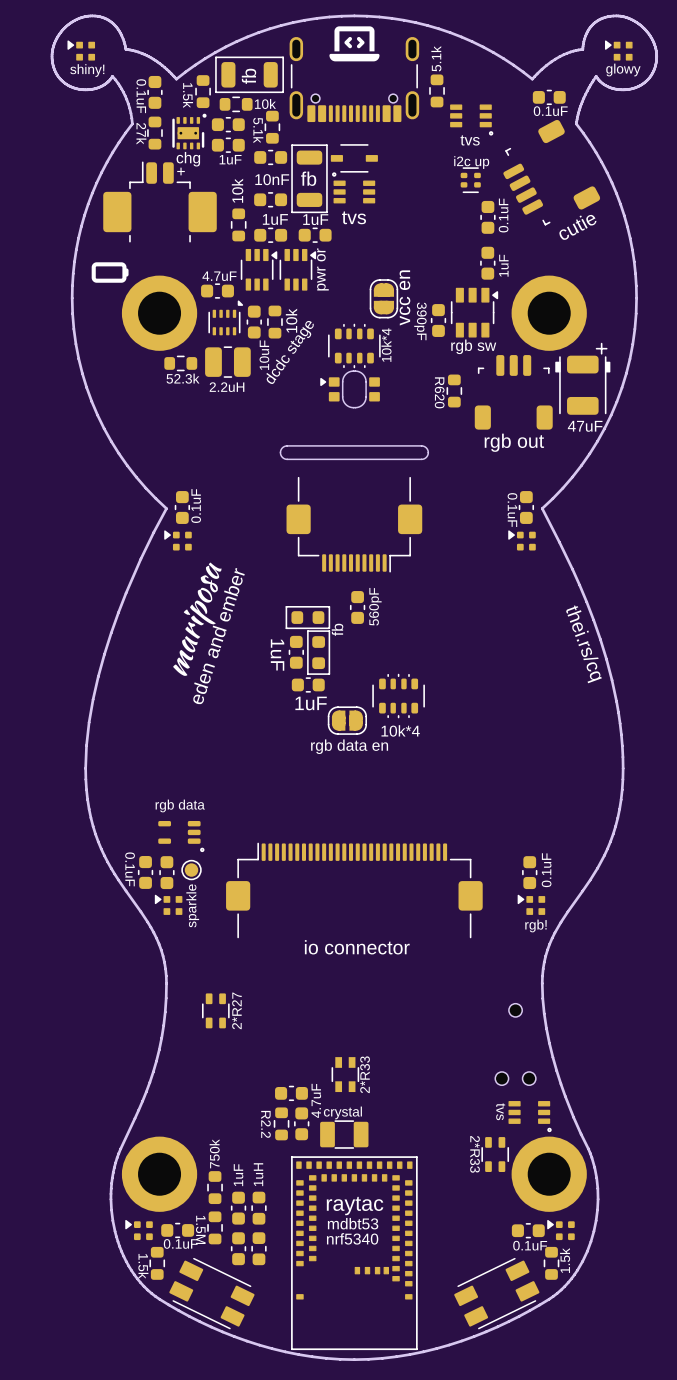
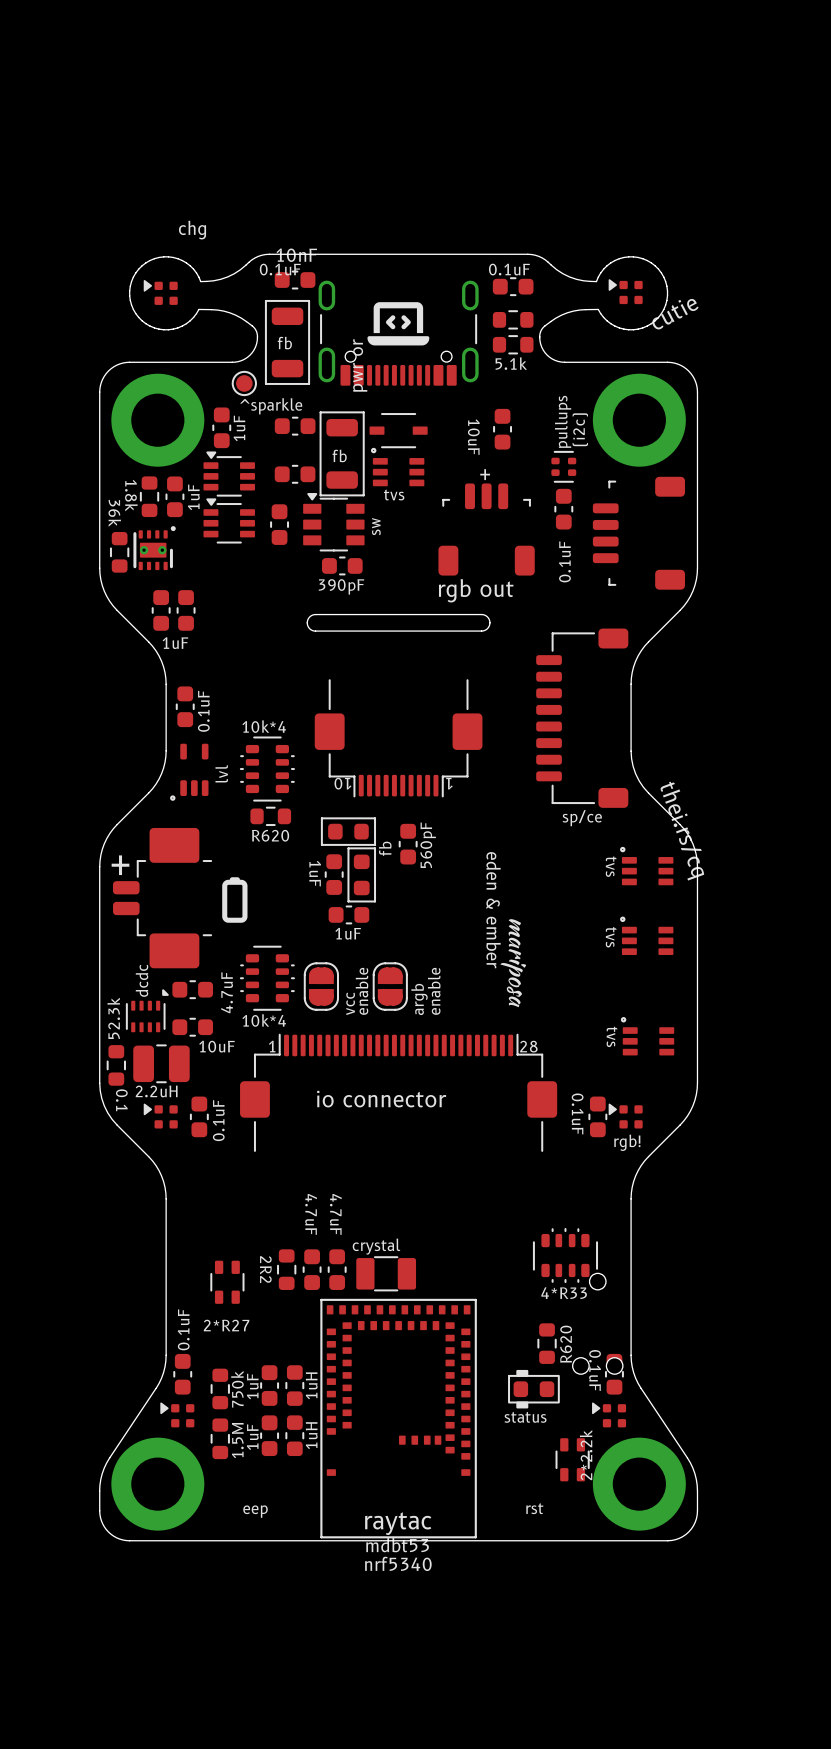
board edge: (90, 15) (73, 21) (59, 34) (52, 52) (54, 69) (65, 83) (82, 89) (99, 87) (112, 76) (126, 99) (132, 123) (101, 172) (81, 226) (74, 261) (72, 285) (75, 344) (86, 387) (104, 428) (127, 465) (166, 508) (140, 558) (111, 633) (93, 699) (86, 745) (86, 789) (95, 834) (111, 868) (153, 932) (163, 955) (166, 976) (163, 1025) (156, 1061) (142, 1101) (118, 1153) (113, 1172) (110, 1199) (115, 1231) (128, 1265) (147, 1290) (189, 1316) (234, 1336) (285, 1351) (340, 1359) (382, 1358) (436, 1348) (497, 1326) (529, 1310) (557, 1293) (571, 1278) (582, 1261) (590, 1241) (596, 1220) (597, 1188) (594, 1167) (565, 1096) (552, 1057) (544, 1013) (542, 976) (545, 955) (554, 932) (597, 868) (613, 834) (622, 789) (622, 745) (616, 701) (600, 639) (579, 585) (542, 508) (581, 465) (604, 428) (616, 401) (626, 373) (634, 329) (635, 273) (627, 226) (607, 172) (576, 124) (578, 114) (585, 94) (596, 76) (605, 85) (619, 89) (633, 88) (645, 81) (655, 66) (655, 48) (649, 34) (636, 22) (622, 16) (605, 17) (596, 21) (589, 28) (584, 38) (582, 49) (570, 51) (555, 59) (532, 79) (483, 46) (439, 28) (391, 18) (341, 16) (304, 20) (258, 32) (215, 52) (176, 79) (151, 57) (125, 49) (120, 32) (110, 21) (100, 16) (90, 15) -> (156, 1388) (109, 1457) (100, 1479) (101, 1520) (110, 1534) (122, 1540) (667, 1540) (682, 1536) (688, 1531) (695, 1522) (697, 1491) (692, 1468) (641, 1388) (632, 1366) (631, 1198) (633, 1181) (641, 1165) (683, 1120) (692, 1105) (696, 1094) (697, 860) (692, 843) (687, 833) (643, 787) (635, 773) (631, 751) (631, 684) (633, 666) (641, 650) (683, 606) (692, 591) (696, 579) (697, 388) (690, 373) (677, 363) (667, 362) (561, 362) (552, 358) (544, 352) (539, 337) (541, 329) (550, 321) (567, 312) (579, 310) (598, 309) (606, 320) (623, 329) (638, 329) (651, 323) (663, 309) (667, 290) (661, 273) (647, 260) (633, 256) (614, 260) (603, 269) (596, 281) (569, 276) (542, 257) (527, 254) (265, 254) (254, 258) (227, 276) (200, 281) (193, 269) (186, 262) (173, 257) (163, 256) (145, 262) (133, 277) (129, 290) (131, 305) (138, 317) (149, 326) (159, 329) (173, 329) (190, 320) (198, 309) (217, 310) (241, 318) (254, 327) (257, 336) (253, 350) (240, 360) (122, 363) (113, 366) (106, 373) (99, 388) (100, 579) (104, 591) (113, 606) (156, 650) (161, 661) (165, 678) (166, 750) (163, 768) (152, 788) (109, 833) (102, 849) (99, 866) (100, 1090) (104, 1105) (112, 1119) (156, 1165) (161, 1175) (165, 1193) (165, 1361) (161, 1378) (156, 1388)
drawing position: (354, 38) -> (398, 317)
drawing position: (348, 42) -> (390, 322)
drawing position: (360, 42) -> (406, 322)
part: (81, 50) -> none
part: (618, 50) -> none
drawing position: (354, 57) -> (398, 340)
text: 5.1k (436, 58) -> none
text: glowy (623, 69) -> none
text: shiny! (87, 70) -> none
part: (249, 74) -> none
text: fb (249, 76) -> none
part position: (354, 79) -> (398, 333)
part: (437, 90) -> none
part: (203, 91) -> none
part: (154, 92) -> none
text: 1.5k (188, 95) -> none
text: 0.1uF (141, 96) -> none
part: (549, 97) -> none
text: 10k (265, 103) -> none
part: (236, 104) -> none
text: 0.1uF (550, 111) -> none
part: (471, 120) -> none
part: (228, 124) -> none
part: (272, 127) -> none
text: 5.1k (258, 130) -> none
part position: (189, 131) -> (154, 548)
text: 27k (141, 133) -> none
part: (154, 133) -> none
text: tvs (470, 140) -> none
part: (228, 145) -> none
part: (270, 157) -> none
part position: (354, 158) -> (398, 430)
text: 1uF (230, 159) -> none
part footprint: [103, 161, 217, 243] -> [143, 280, 178, 305]
text: i2c up (471, 162) -> none
text: + (181, 171) -> none
part: (551, 172) -> none
text: fb (308, 178) -> none
part: (309, 178) -> none
part position: (470, 180) -> (563, 466)
part: (353, 187) -> none
text: 10k (237, 190) -> 0.1uF (280, 269)
text: none -> 0.1uF (509, 269)
part: none -> (513, 286)
part: none -> (625, 291)
text: 0.1uF (503, 215) -> none
text: tvs (354, 217) -> none
part: (487, 217) -> none
text: 1uF (275, 219) -> none
text: 1uF (315, 219) -> none
part: (238, 224) -> none
part: none -> (513, 319)
part: (270, 235) -> none
part: (315, 235) -> none
text: none -> fb (284, 343)
part: none -> (287, 342)
part: none -> (513, 344)
drawing: [91, 262, 129, 283] -> none
part: (487, 263) -> none
text: 1uF (503, 265) -> none
text: none -> 5.1k (511, 363)
part: (259, 269) -> none
part: (297, 269) -> none
text: 4.7uF (219, 276) -> none
part: none -> (244, 383)
part: (217, 291) -> none
text: vcc en (404, 297) -> none
part: (383, 298) -> none
text: none -> ^sparkle (271, 406)
part footprint: [267, 305, 283, 339] -> [274, 416, 316, 436]
part rotation: 0° (474, 312) -> 90° counterclockwise (333, 522)
part position: (474, 312) -> (333, 522)
text: none -> pullups (563, 421)
part: (225, 317) -> none
part: none -> (221, 427)
text: none -> 1uF (239, 428)
text: 10k (291, 320) -> none
text rotation: 0° (420, 321) -> 90° counterclockwise (341, 586)
text position: 390pF (420, 321) -> 390pF (341, 586)
part: (254, 322) -> none
text: none -> (i2c) (580, 429)
part footprint: [328, 323, 381, 369] -> [370, 447, 425, 487]
part: none -> (342, 453)
text: none -> fb (339, 455)
text: 10k*4 (386, 345) -> none
part footprint: [205, 346, 251, 378] -> [203, 451, 255, 497]
text: rgb sw (473, 346) -> none
text: dcdc stage (290, 351) -> none
text rotation: 0° (264, 355) -> 180° (473, 437)
text position: 10uF (264, 355) -> 10uF (473, 437)
text: none -> + (485, 474)
part: none -> (295, 474)
part rotation: 0° (180, 363) -> 90° clockwise (149, 496)
part position: (180, 363) -> (149, 496)
text: none -> 1.8k (131, 495)
text: none -> tvs (394, 494)
part: none -> (174, 496)
text: none -> 1uF (193, 497)
text: 52.3k (182, 378) -> none
part: (582, 378) -> none
part: none -> (563, 509)
text: none -> 36k (114, 513)
text: 2.2uH (227, 387) -> none
part: (350, 389) -> none
part: (454, 391) -> none
text: R620 (439, 392) -> none
part position: (513, 392) -> (486, 529)
part: none -> (229, 520)
part: none -> (279, 524)
text: none -> sw (376, 526)
part: none -> (638, 533)
part: none -> (119, 552)
text: 47uF (585, 426) -> none
part: none -> (342, 565)
text position: rgb out (514, 442) -> rgb out (476, 590)
board edge: (287, 445) (421, 445) (426, 447) (428, 452) (426, 457) (421, 459) (287, 459) (282, 457) (280, 452) (282, 447) (287, 445) -> none
part: none -> (161, 610)
part: none -> (186, 610)
board edge: none -> (315, 614) (481, 614) (487, 616) (489, 622) (487, 628) (481, 631) (314, 631) (308, 627) (307, 621) (309, 616) (315, 614)
text: none -> 1uF (175, 643)
text position: 0.1uF (196, 506) -> 0.1uF (203, 711)
part: (182, 507) -> none
part: (526, 507) -> none
text rotation: 0° (512, 510) -> 180° (564, 561)
text position: 0.1uF (512, 510) -> 0.1uF (564, 561)
part: (354, 524) -> none
part footprint: [164, 530, 192, 551] -> [175, 686, 195, 728]
part: (522, 540) -> none
part: none -> (582, 718)
text: none -> 10k*4 (264, 726)
drawing: [173, 562, 222, 676] -> none
part: none -> (398, 738)
part: none -> (267, 769)
text: none -> lvl (221, 773)
text position: 560pF (375, 606) -> 560pF (428, 845)
text: none -> 10 (342, 783)
part: (357, 607) -> none
text: none -> 1 (449, 783)
part rotation: 0° (307, 617) -> 90° clockwise (361, 874)
part position: (307, 617) -> (361, 874)
text position: fb (337, 629) -> fb (385, 848)
part: none -> (270, 816)
text: none -> sp/ce (582, 818)
text: eden and ember (218, 636) -> none
text: none -> R620 (270, 835)
part: (296, 652) -> none
part rotation: 0° (318, 652) -> 90° clockwise (348, 831)
text: 1uF (277, 655) -> none
part: none -> (408, 844)
text: none -> + (120, 865)
text: none -> tvs (611, 866)
part: none -> (646, 866)
text: none -> 1uF (315, 873)
drawing: none -> [222, 877, 248, 923]
part rotation: 0° (308, 684) -> 90° clockwise (334, 874)
part: (398, 696) -> none
part: none -> (162, 898)
text: 1uF (311, 703) -> none
text: none -> eden & ember (493, 910)
part: none -> (348, 914)
drawing: none -> [500, 919, 527, 1008]
part: (347, 720) -> none
text: none -> 1uF (348, 933)
text: 10k*4 (400, 730) -> none
part: none -> (646, 935)
text: none -> tvs (611, 937)
text: rgb data en (349, 746) -> none
part: none -> (267, 978)
text: none -> dcdc (141, 980)
part: none -> (321, 986)
part: none -> (390, 986)
part: none -> (192, 989)
text: none -> enable (361, 991)
text: none -> enable (434, 991)
text: none -> 4.7uF (227, 992)
text: none -> argb (419, 999)
text: none -> vcc (350, 1003)
part: none -> (147, 1010)
text: none -> 52.3k (113, 1018)
text: none -> 10k*4 (264, 1020)
part: none -> (192, 1027)
text: rgb data (180, 805) -> none
part: none -> (647, 1036)
text: none -> tvs (612, 1036)
text: none -> 10uF (216, 1046)
text: none -> 1 (272, 1046)
text: none -> 28 (528, 1046)
part: none -> (161, 1063)
part: none -> (116, 1065)
part rotation: 0° (181, 836) -> 90° clockwise (189, 772)
part position: (181, 836) -> (189, 772)
text: none -> 2.2uH (156, 1091)
part footprint: [159, 856, 175, 890] -> [143, 1103, 178, 1129]
part: none -> (398, 1092)
part footprint: [181, 859, 202, 881] -> [189, 1096, 209, 1138]
text: none -> 0.1 (121, 1100)
text rotation: 0° (130, 869) -> 180° (218, 1120)
text position: 0.1uF (130, 869) -> 0.1uF (218, 1120)
text rotation: 0° (546, 870) -> 180° (577, 1113)
text position: 0.1uF (546, 870) -> 0.1uF (577, 1113)
part: (145, 872) -> none
part position: (529, 872) -> (597, 1116)
part: none -> (625, 1116)
part: (354, 890) -> none
part: (168, 904) -> none
part: (531, 904) -> none
text: sparkle (192, 905) -> none
text position: rgb! (535, 925) -> rgb! (627, 1142)
text position: io connector (357, 947) -> io connector (381, 1099)
text: none -> 4.7uF (311, 1214)
text: none -> 4.7uF (335, 1214)
part: none -> (565, 1255)
part: none -> (286, 1269)
part: none -> (312, 1269)
part: none -> (337, 1269)
text: none -> 2R2 (265, 1269)
text rotation: 0° (236, 1010) -> 90° clockwise (226, 1325)
text: none -> 4*R33 (564, 1293)
text: none -> 0.1uF (183, 1329)
part: none -> (547, 1343)
text: none -> R620 (566, 1344)
part: (345, 1074) -> none
text: 2*R33 (365, 1074) -> none
text: none -> 0.1uF (595, 1370)
part: none -> (182, 1374)
part: none -> (614, 1374)
part: (291, 1093) -> none
text: none -> 1uF (252, 1386)
part: none -> (269, 1385)
part: none -> (294, 1385)
text: none -> 1uH (311, 1385)
part: none -> (220, 1388)
part: none -> (533, 1389)
text: 4.7uF (316, 1100) -> none
part footprint: [508, 1101, 552, 1133] -> [592, 1402, 627, 1428]
text: tvs (500, 1111) -> none
text position: crystal (342, 1112) -> crystal (376, 1246)
text: none -> status (525, 1417)
part: (281, 1123) -> none
part: (301, 1123) -> none
text: R2.2 (265, 1124) -> none
text: none -> 1uH (311, 1435)
part position: (344, 1134) -> (386, 1273)
part: none -> (269, 1435)
part: none -> (294, 1435)
part: none -> (220, 1438)
text: none -> 2*2.2k (586, 1455)
text position: 750k (214, 1153) -> 750k (237, 1389)
text: 2*R33 (474, 1154) -> none
text: 1uH (258, 1174) -> none
text position: 1uF (238, 1175) -> 1uF (252, 1437)
part: (215, 1187) -> none
text: none -> rst (534, 1508)
text: none -> eep (255, 1511)
part: (238, 1208) -> none
part: (258, 1208) -> none
part: (215, 1227) -> none
text rotation: 0° (200, 1229) -> 180° (237, 1440)
text position: 1.5M (200, 1229) -> 1.5M (237, 1440)
part position: (139, 1230) -> (177, 1414)
part: (177, 1230) -> none
part: (528, 1230) -> none
part: (560, 1230) -> none
text: 0.1uF (180, 1243) -> none
text: 0.1uF (530, 1245) -> none
part: (238, 1248) -> none
part: (258, 1248) -> none
part position: (354, 1253) -> (398, 1418)
text: 1.5k (565, 1260) -> none
part: (157, 1263) -> none
part: (551, 1263) -> none
text: 1.5k (143, 1266) -> none
part: (211, 1293) -> none
part: (496, 1293) -> none

